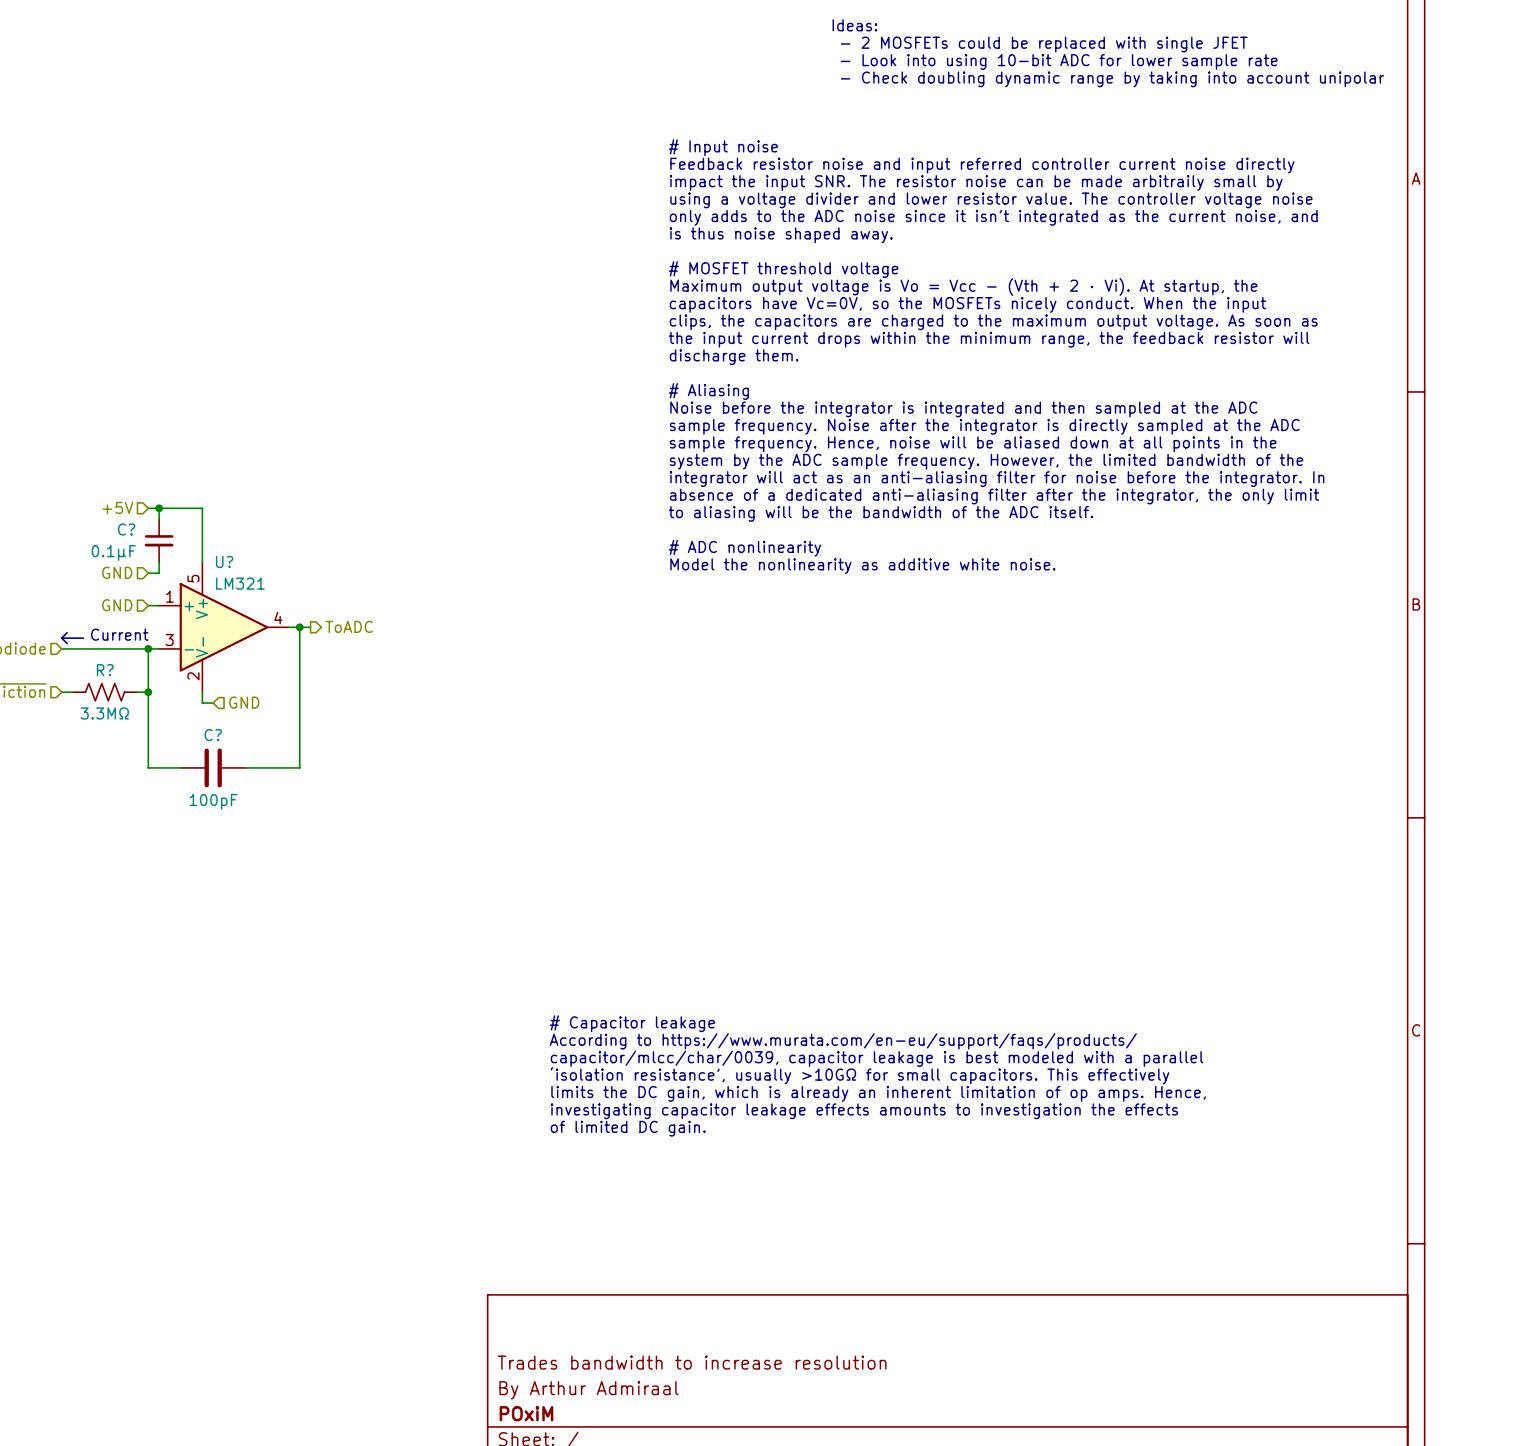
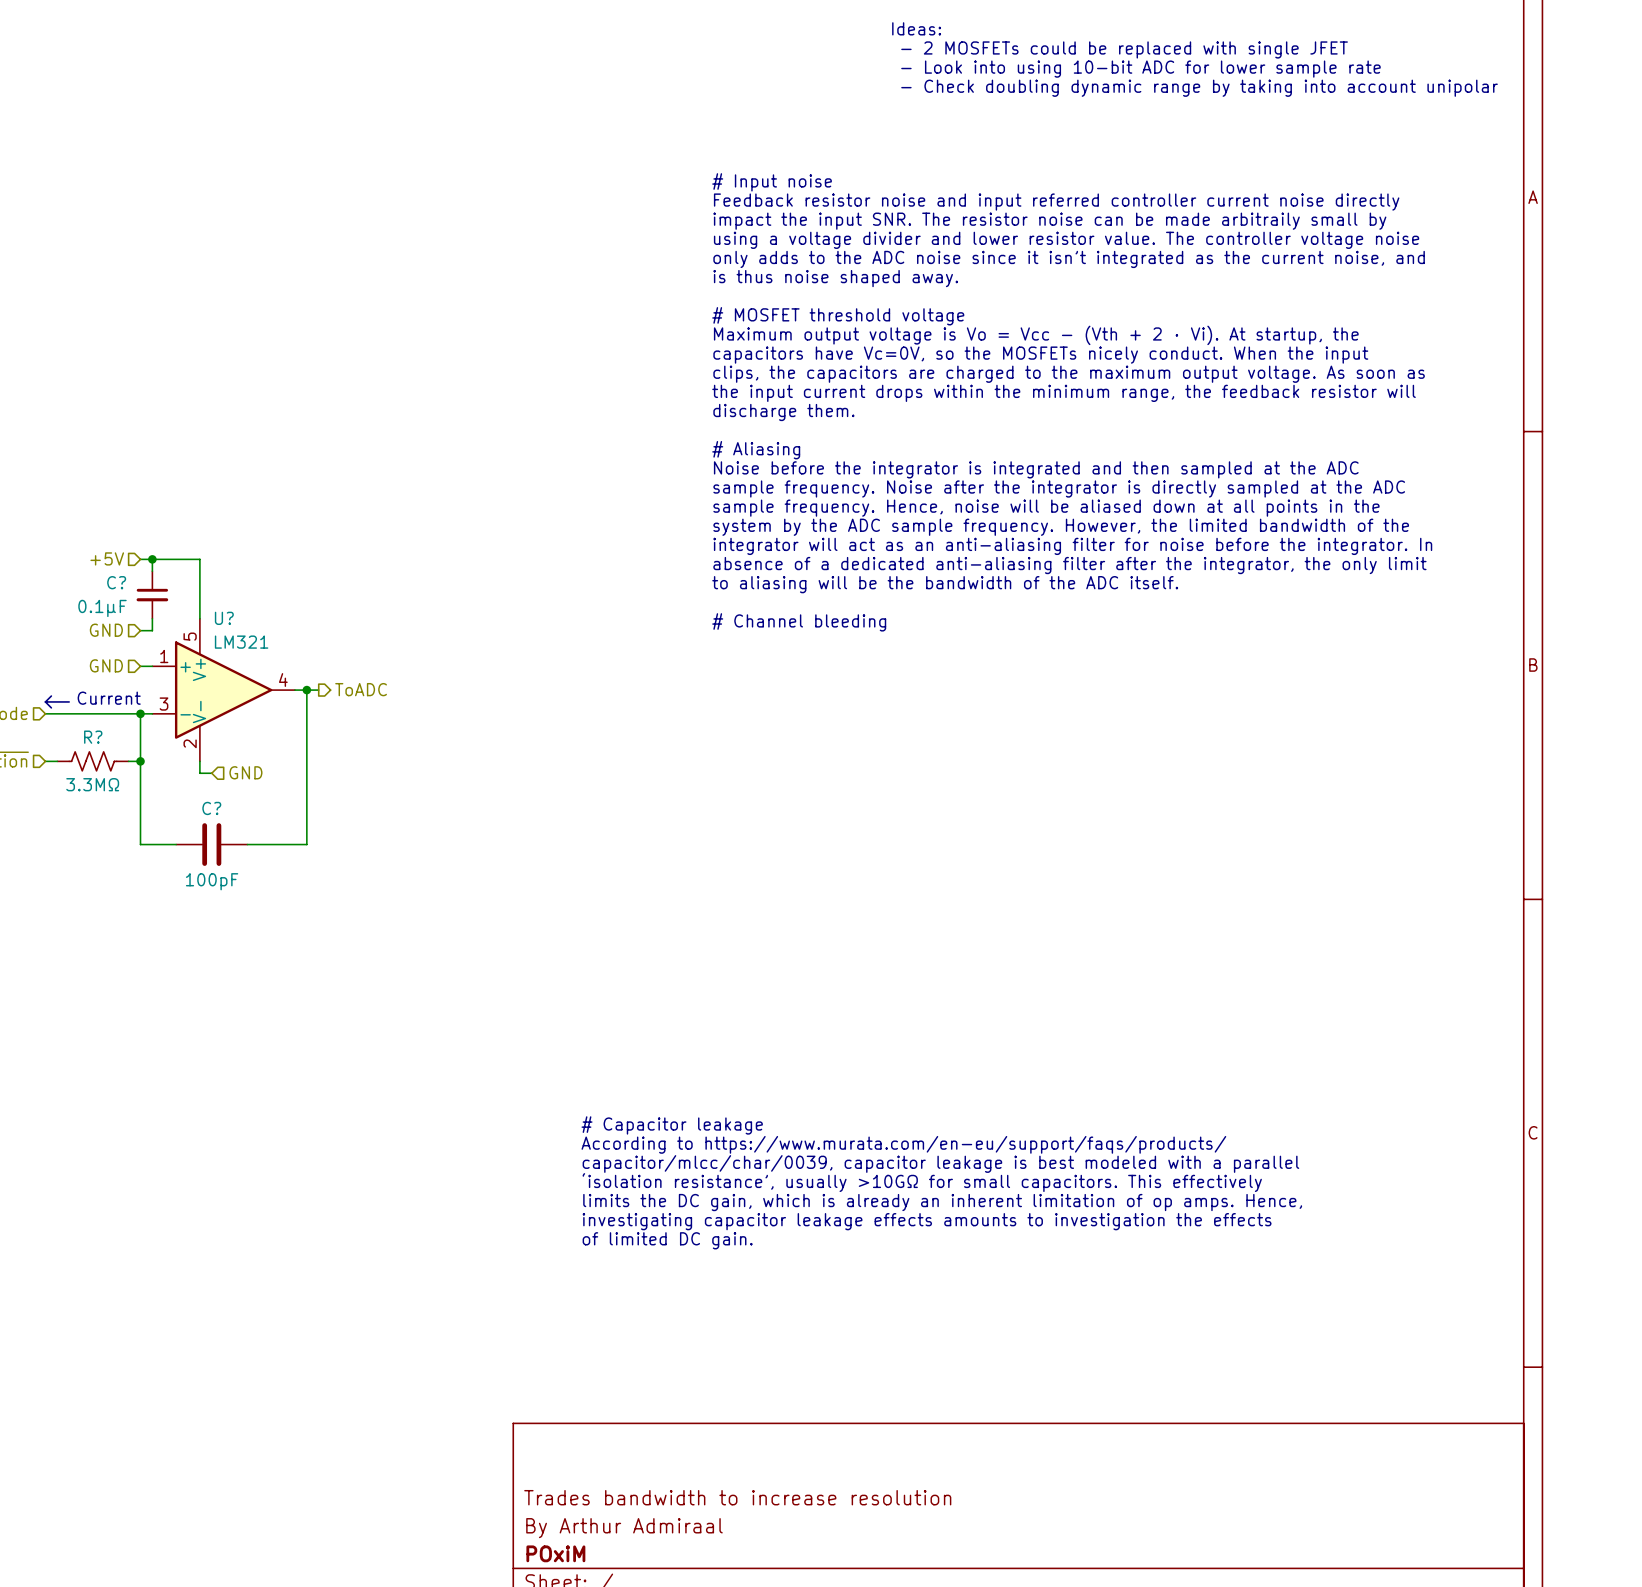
text: # Input noise (723, 147) -> none
text: Feedback resistor noise and input referred controller current noise directly (982, 165) -> # Input noise (772, 182)
text: impact the input SNR. The resistor noise can be made arbitraily small by (976, 182) -> Feedback resistor noise and input referred controller current noise directly (1056, 202)
text: using a voltage divider and lower resistor value. The controller voltage noise (991, 200) -> impact the input SNR. The resistor noise can be made arbitraily small by (1049, 221)
text: only adds to the ADC noise since it isn’t integrated as the current noise, and (993, 217) -> using a voltage divider and lower resistor value. The controller voltage noise (1066, 240)
text: is thus noise shaped away. (781, 235) -> only adds to the ADC noise since it isn’t integrated as the current noise, and (1069, 259)
text: none -> is thus noise shaped away. (835, 278)
text: # MOSFET threshold voltage (783, 269) -> none
text: Maximum output voltage is Vo = Vcc - (Vth + 2 · Vi). At startup, the (963, 286) -> # MOSFET threshold voltage (838, 316)
text: capacitors have Vc=0V, so the MOSFETs nicely conduct. When the input (967, 304) -> Maximum output voltage is Vo = Vcc - (Vth + 2 · Vi). At startup, the (1036, 335)
text: clips, the capacitors are charged to the maximum output voltage. As soon as (993, 322) -> capacitors have Vc=0V, so the MOSFETs nicely conduct. When the input (1040, 355)
text: the input current drops within the minimum range, the feedback resistor will (989, 339) -> clips, the capacitors are charged to the maximum output voltage. As soon as (1069, 374)
text: discharge them. (734, 357) -> the input current drops within the minimum range, the feedback resistor will (1064, 393)
text: none -> discharge them. (783, 412)
text: # Aliasing (708, 391) -> none
text: Noise before the integrator is integrated and then sampled at the ADC (963, 409) -> # Aliasing (756, 450)
text: sample frequency. Noise after the integrator is directly sampled at the ADC (984, 426) -> Noise before the integrator is integrated and then sampled at the ADC (1036, 469)
text: sample frequency. Hence, noise will be aliased down at all points in the (973, 444) -> sample frequency. Noise after the integrator is directly sampled at the ADC (1059, 489)
text: system by the ADC sample frequency. However, the limited bandwidth of the (986, 461) -> sample frequency. Hence, noise will be aliased down at all points in the (1046, 508)
text: integrator will act as an anti-aliasing filter for noise before the integrator. In (997, 479) -> system by the ADC sample frequency. However, the limited bandwidth of the (1061, 527)
text: absence of a dedicated anti-aliasing filter after the integrator, the only limit (994, 496) -> integrator will act as an anti-aliasing filter for noise before the integrator. In (1072, 546)
text: to aliasing will be the bandwidth of the ADC itself. (880, 513) -> absence of a dedicated anti-aliasing filter after the integrator, the only limit (1069, 565)
text: none -> to aliasing will be the bandwidth of the ADC itself. (945, 584)
text: # ADC nonlinearity (744, 548) -> none
text: Model the nonlinearity as additive white noise. (862, 566) -> # Channel bleeding (799, 622)

